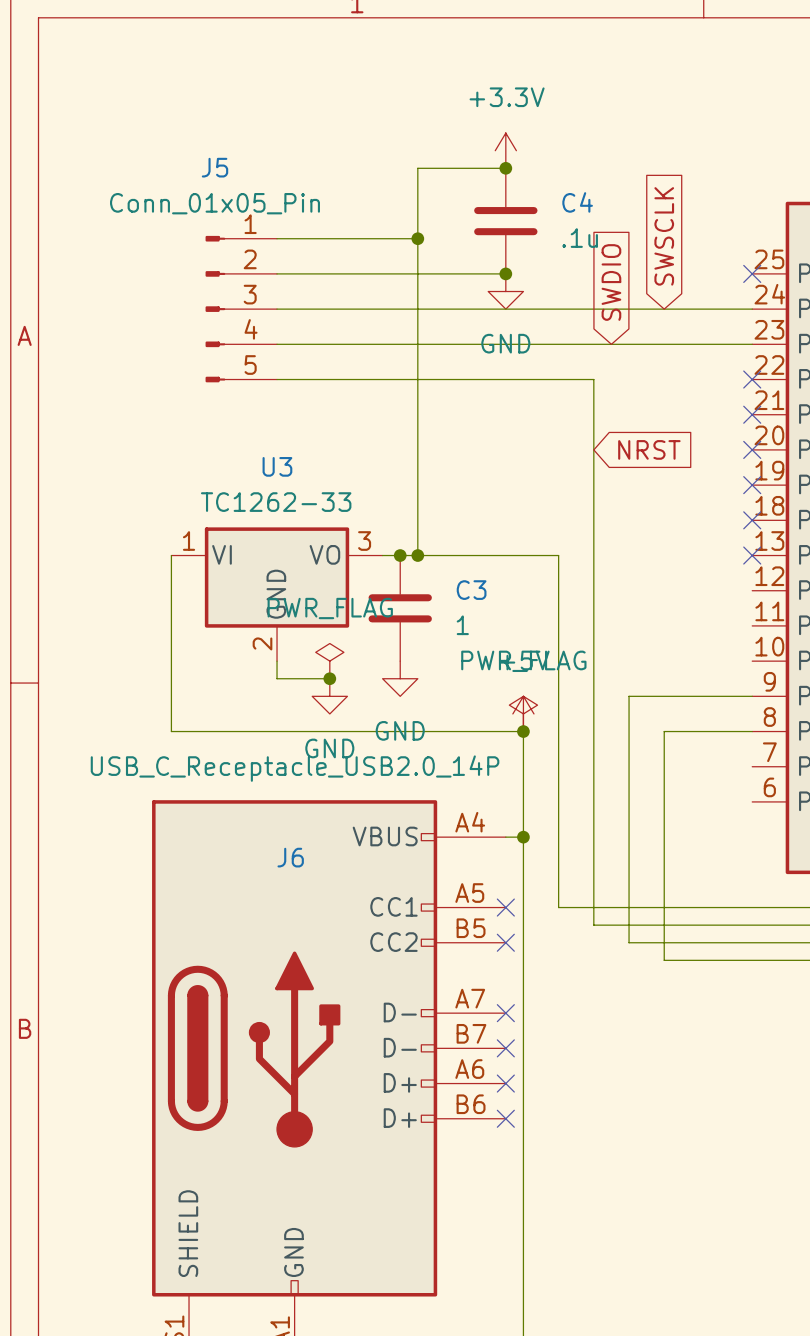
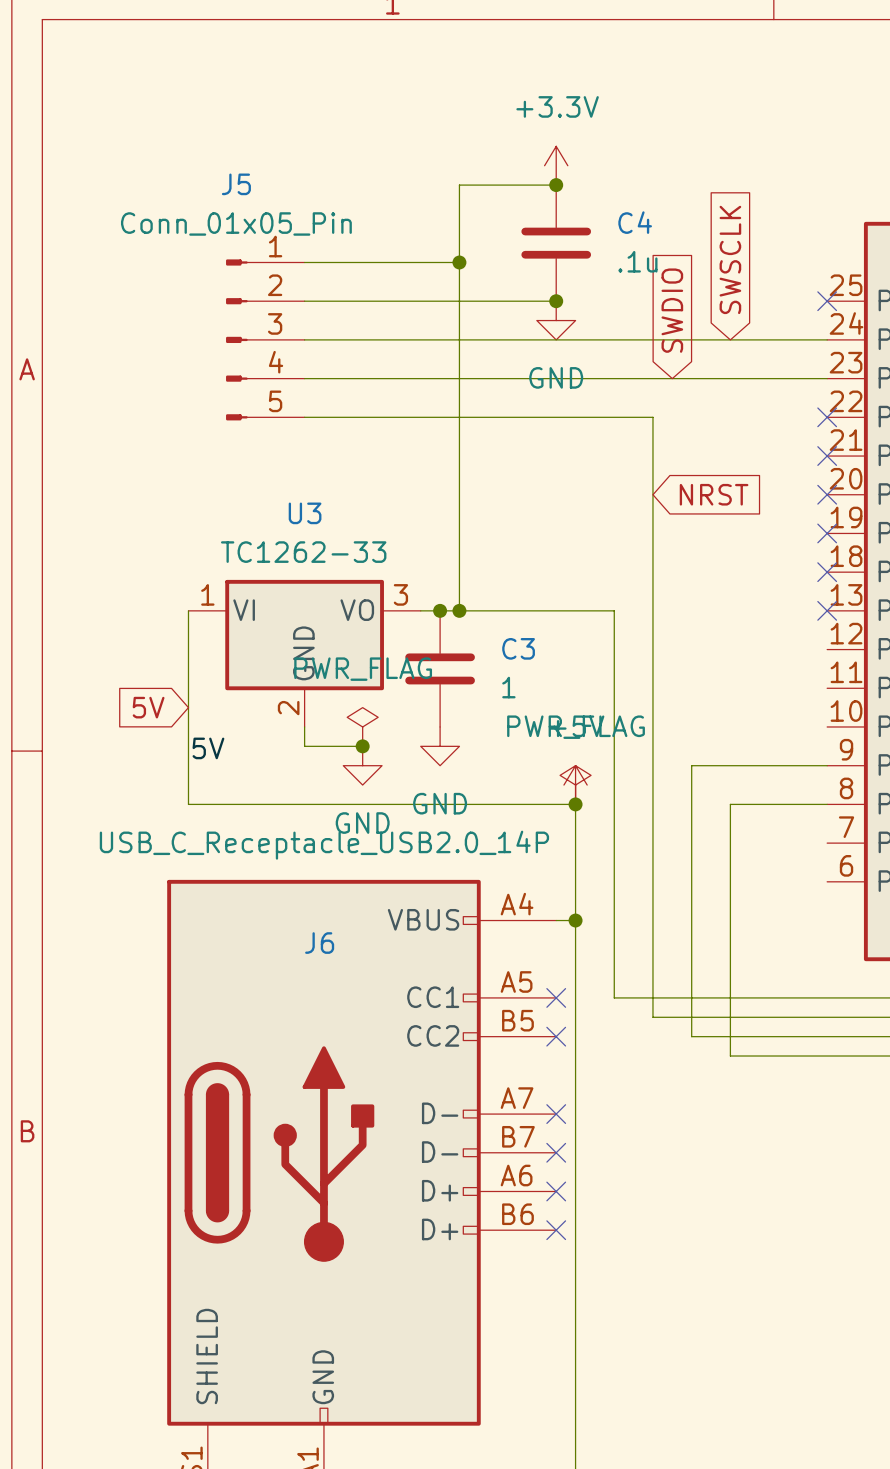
global label: none -> 5V (148, 707)
label: none -> 5V (208, 748)

